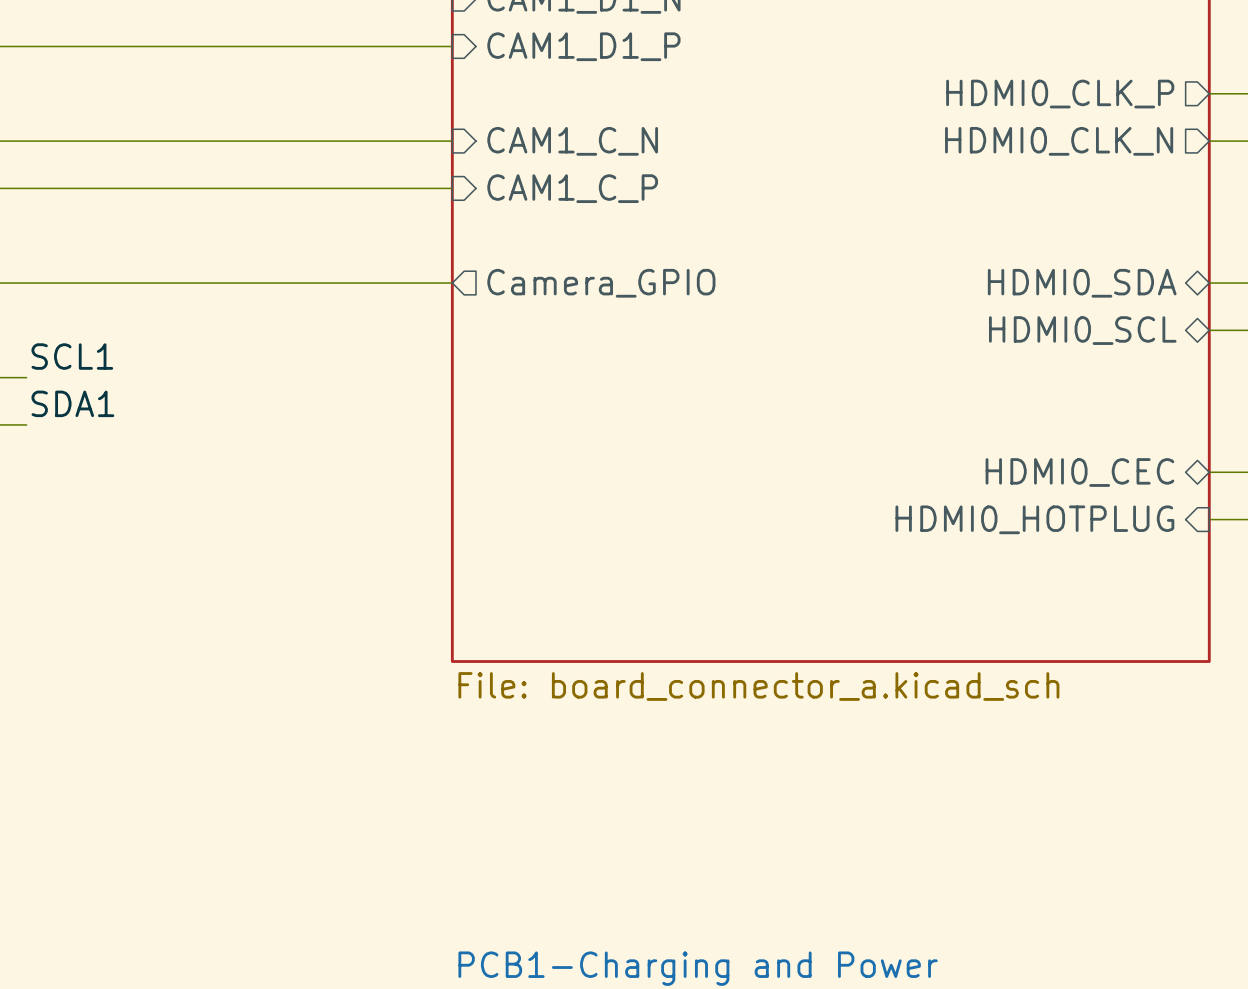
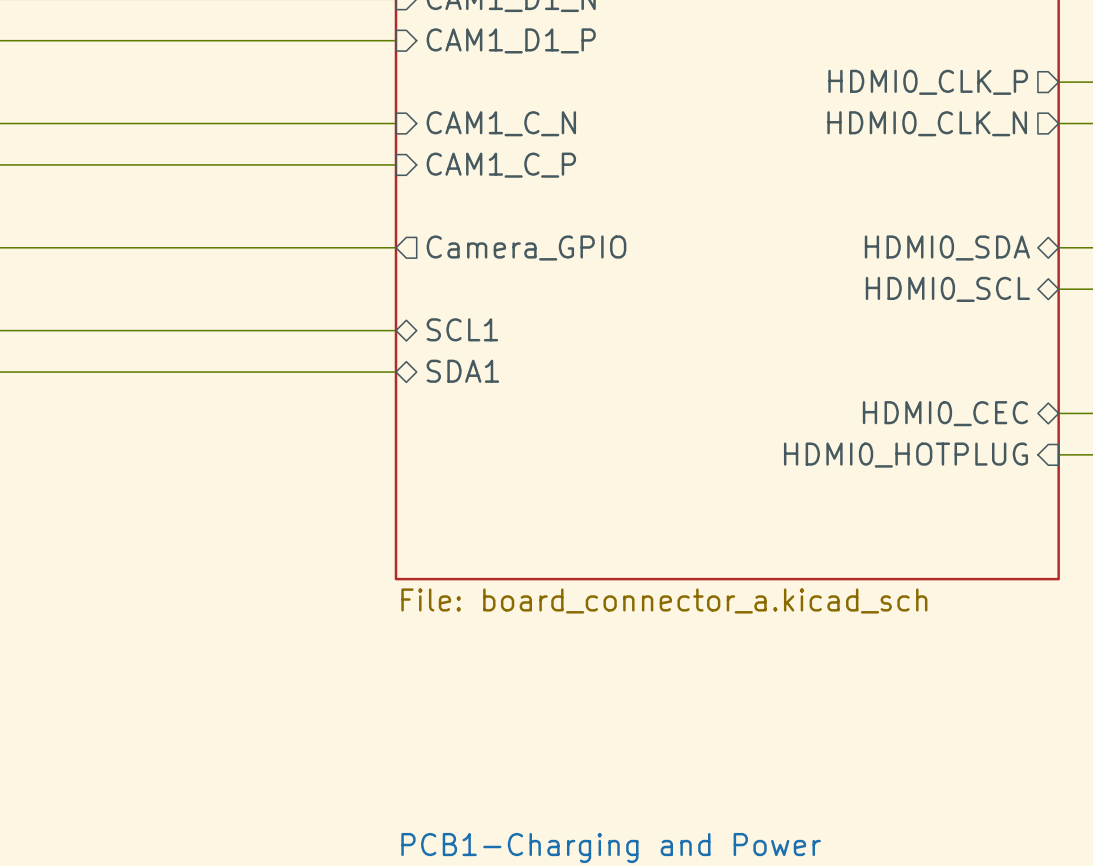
label: SCL1 (72, 356) -> none
sheet pin: none -> SCL1 (462, 329)
wire: none -> (23, 330) (395, 330)
label: SDA1 (72, 403) -> none
wire: none -> (23, 372) (395, 372)
sheet pin: none -> SDA1 (462, 371)

